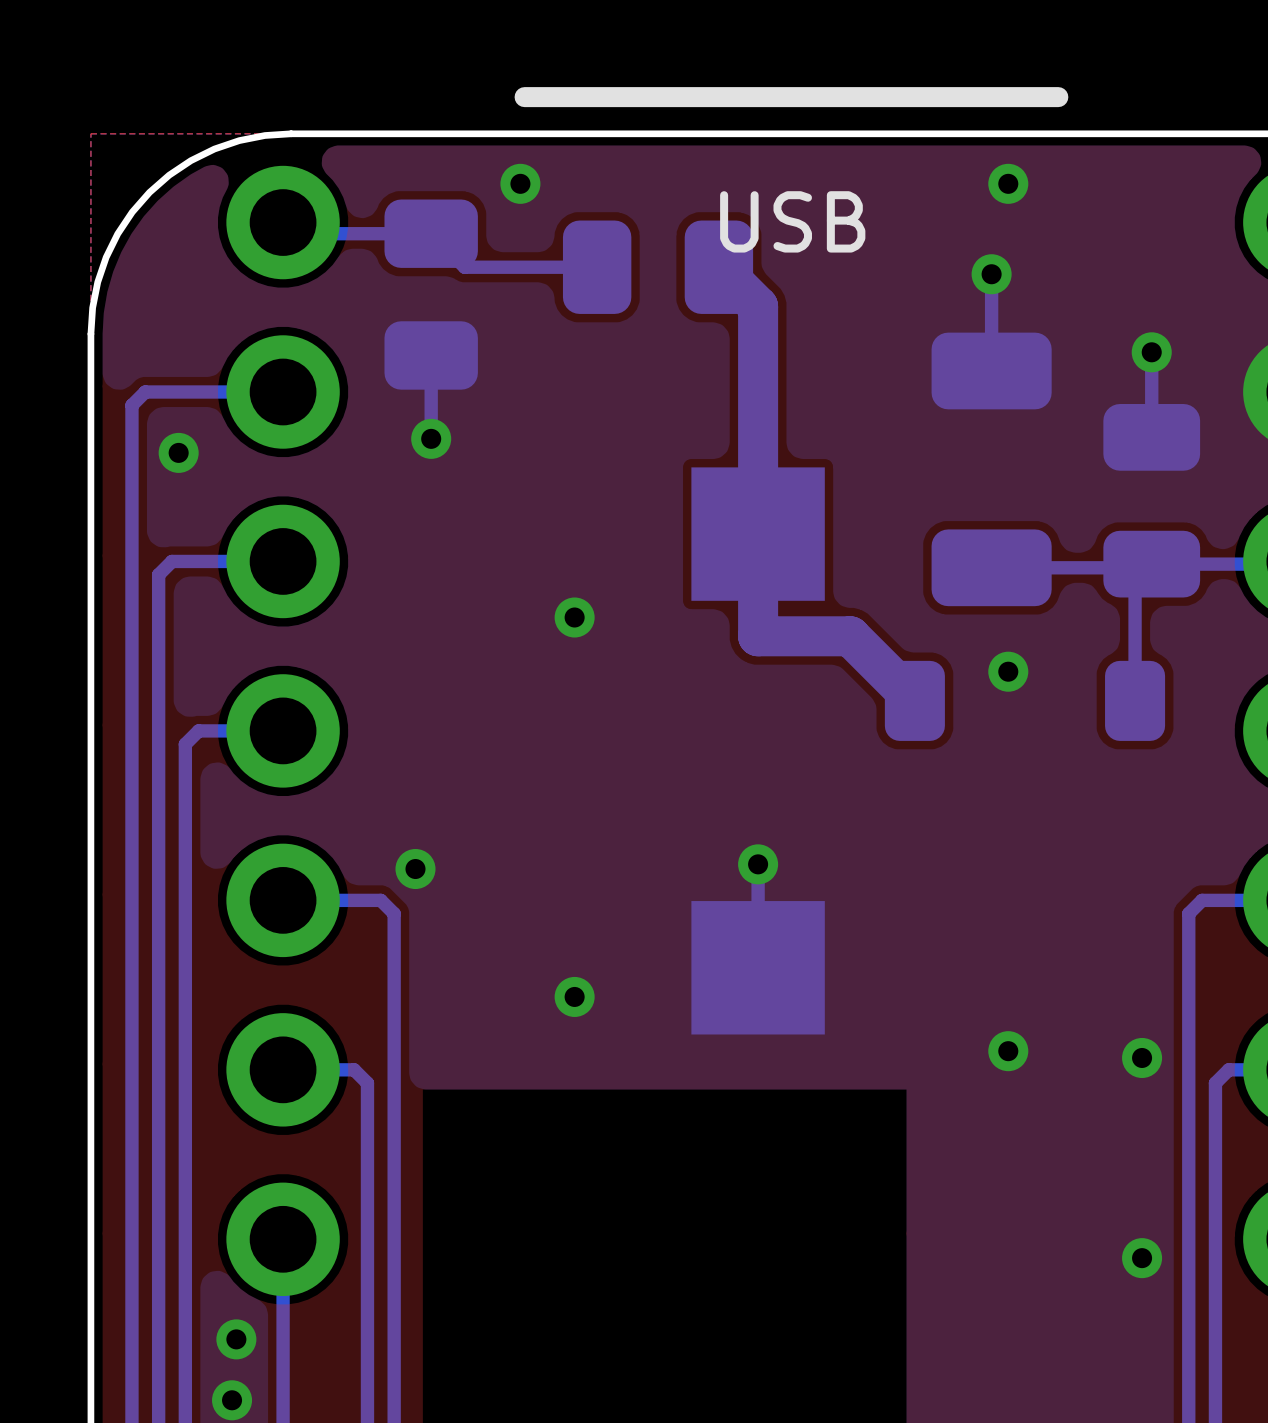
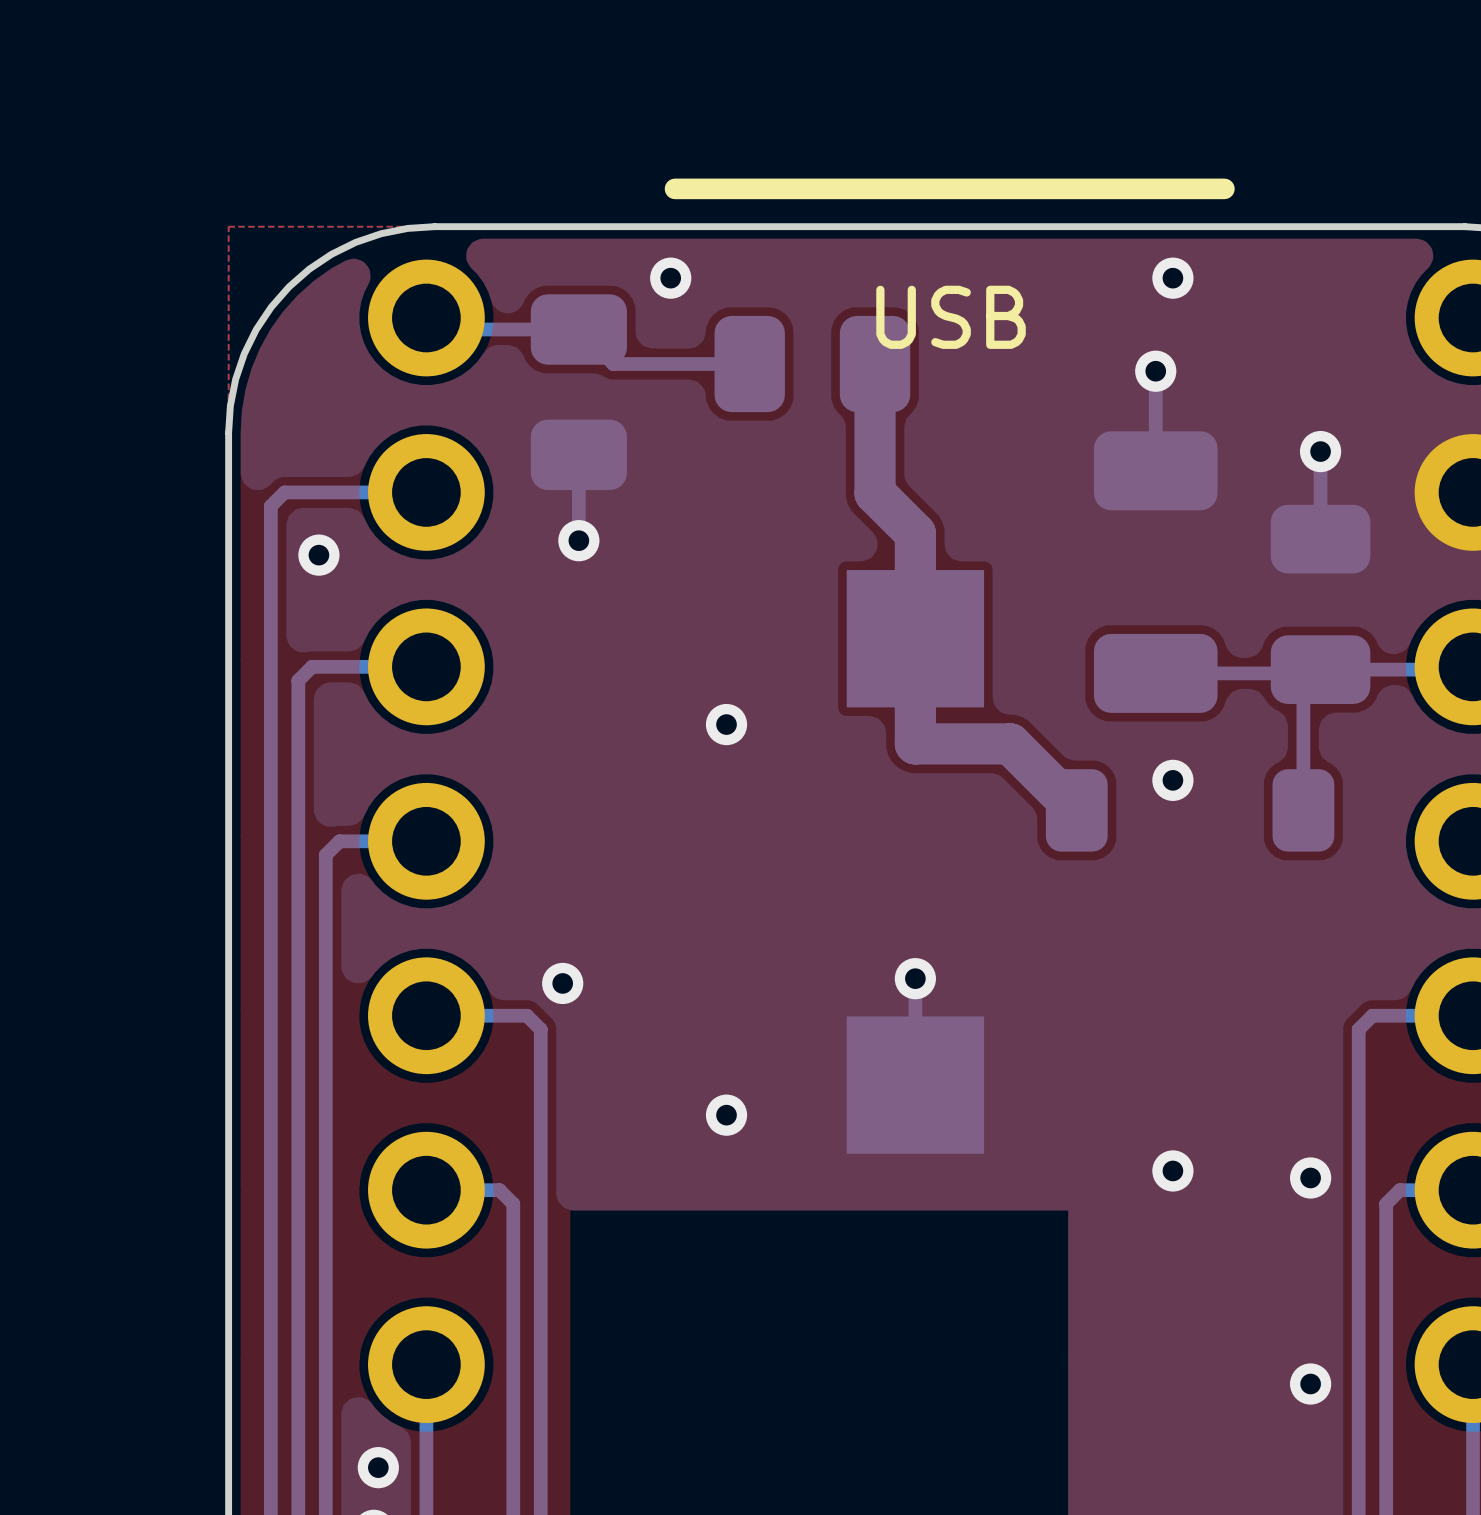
bottom track: (718, 267) (758, 306) (758, 431) -> (875, 364) (875, 493) (915, 533)

